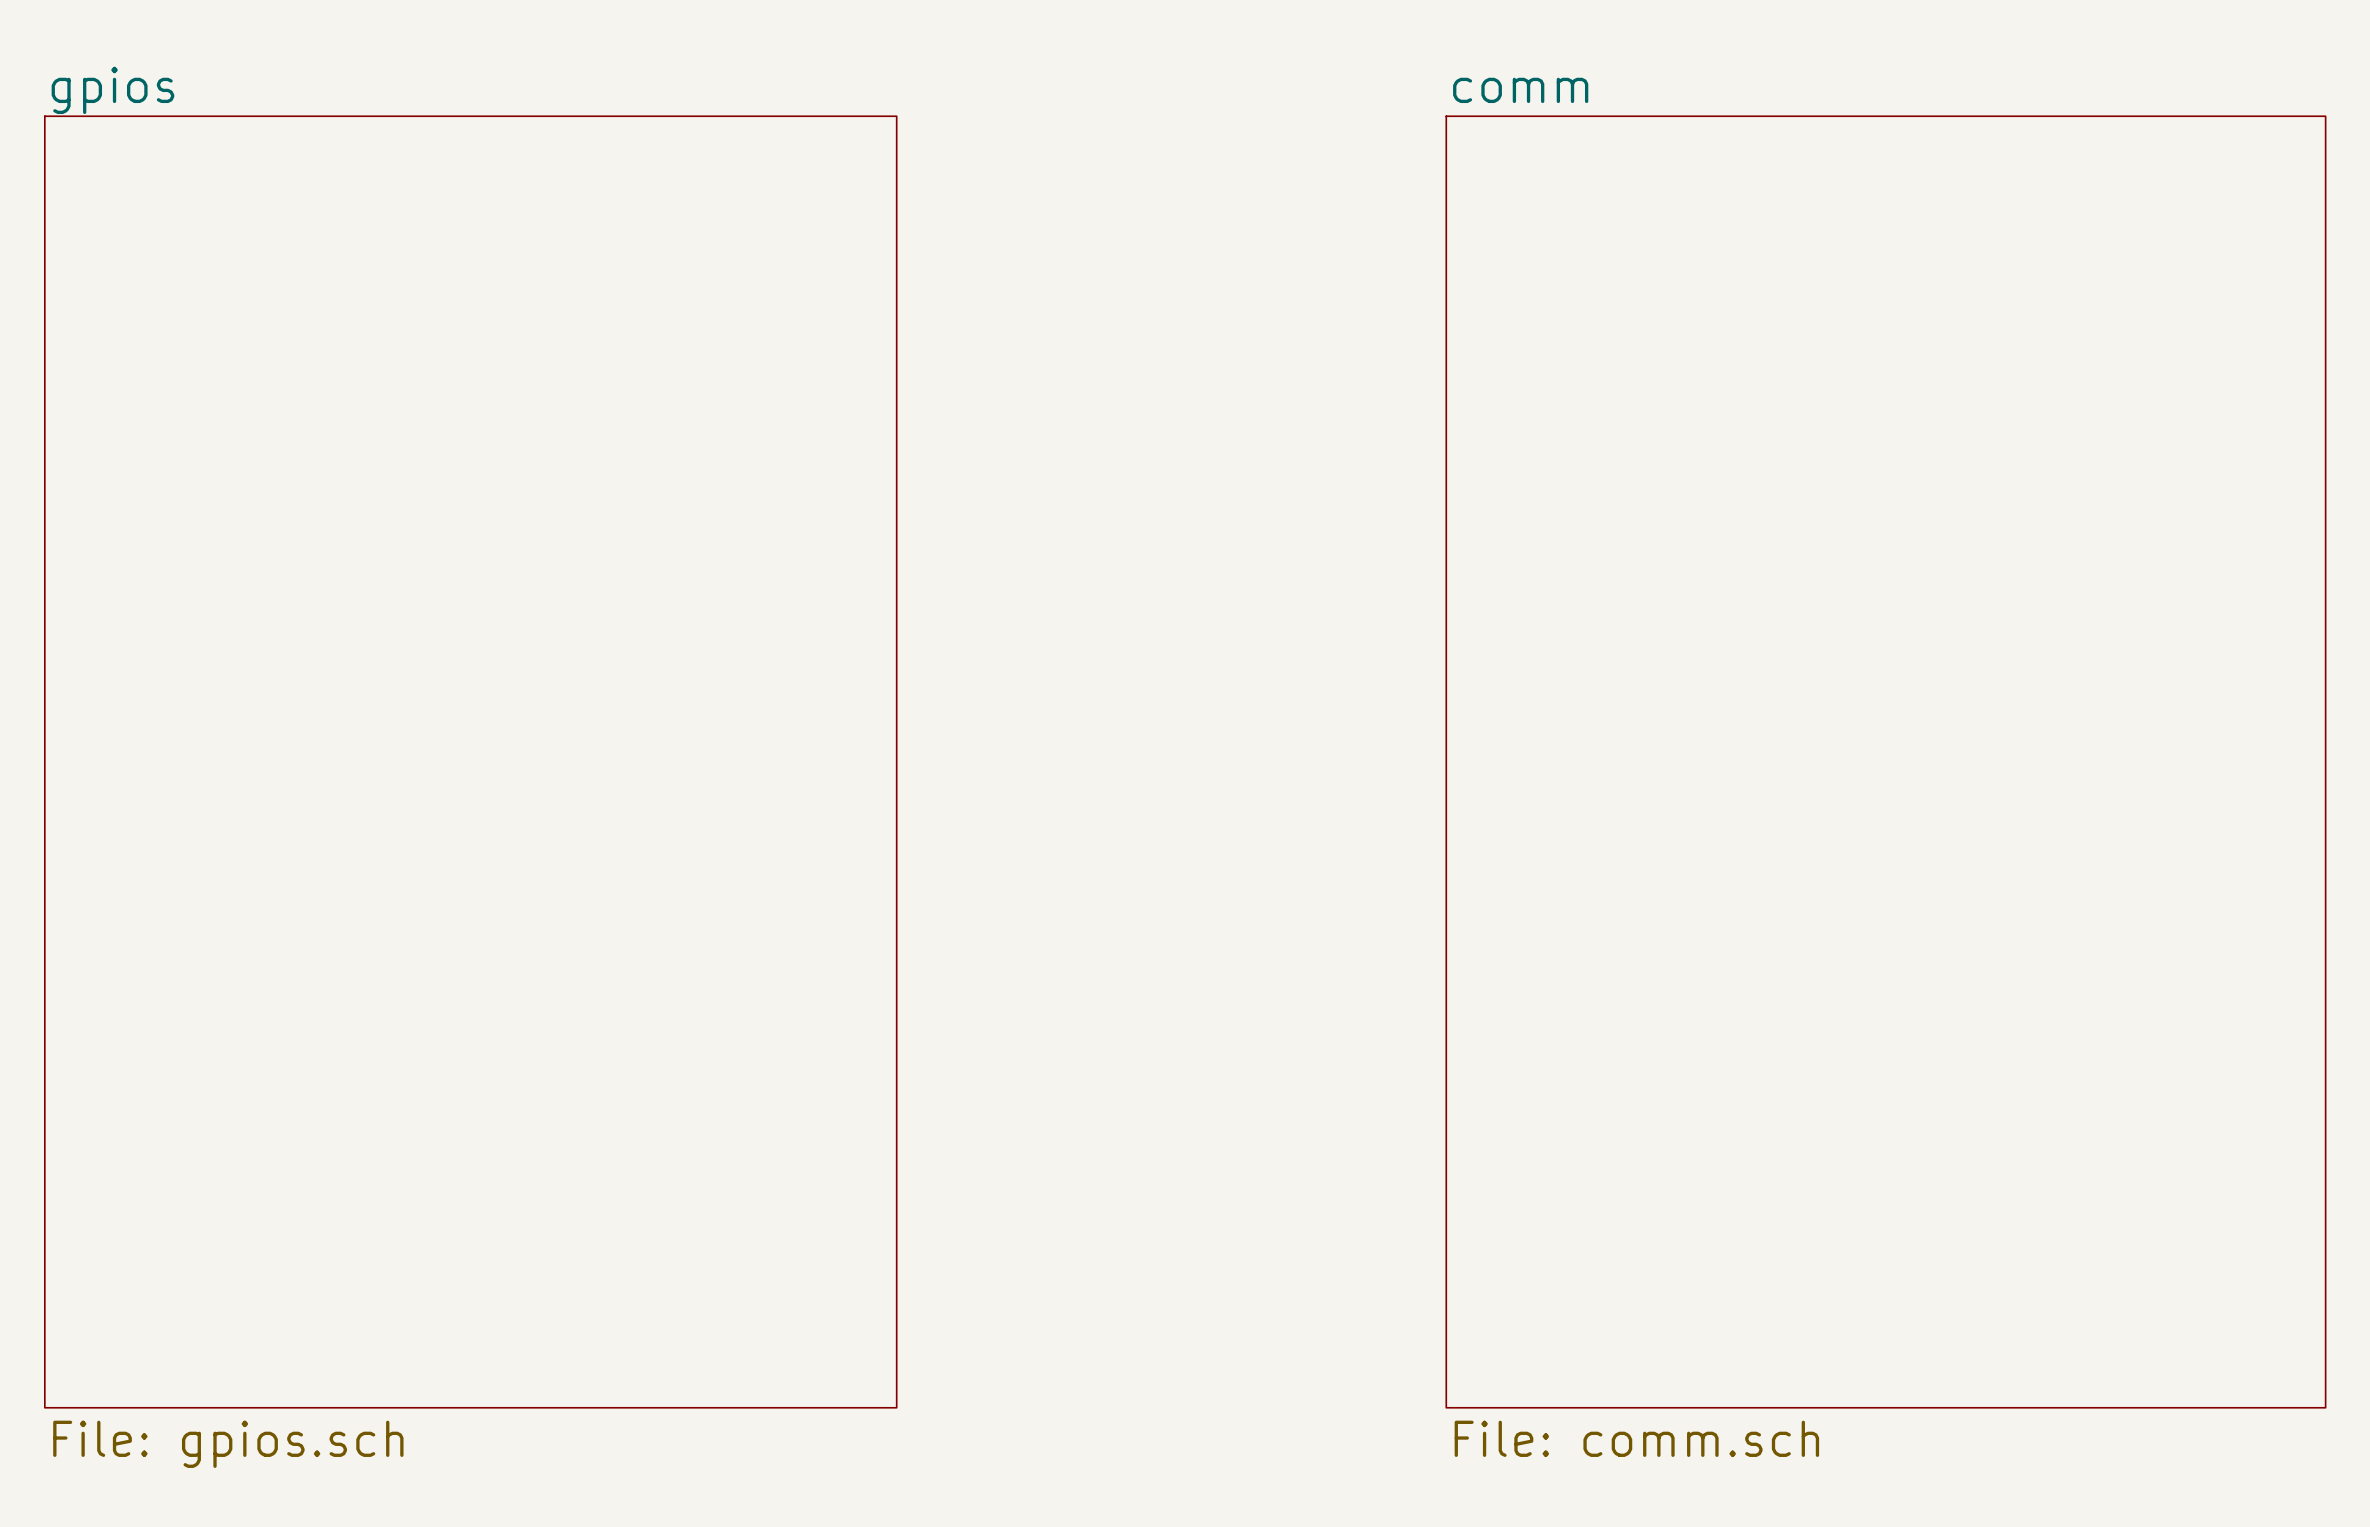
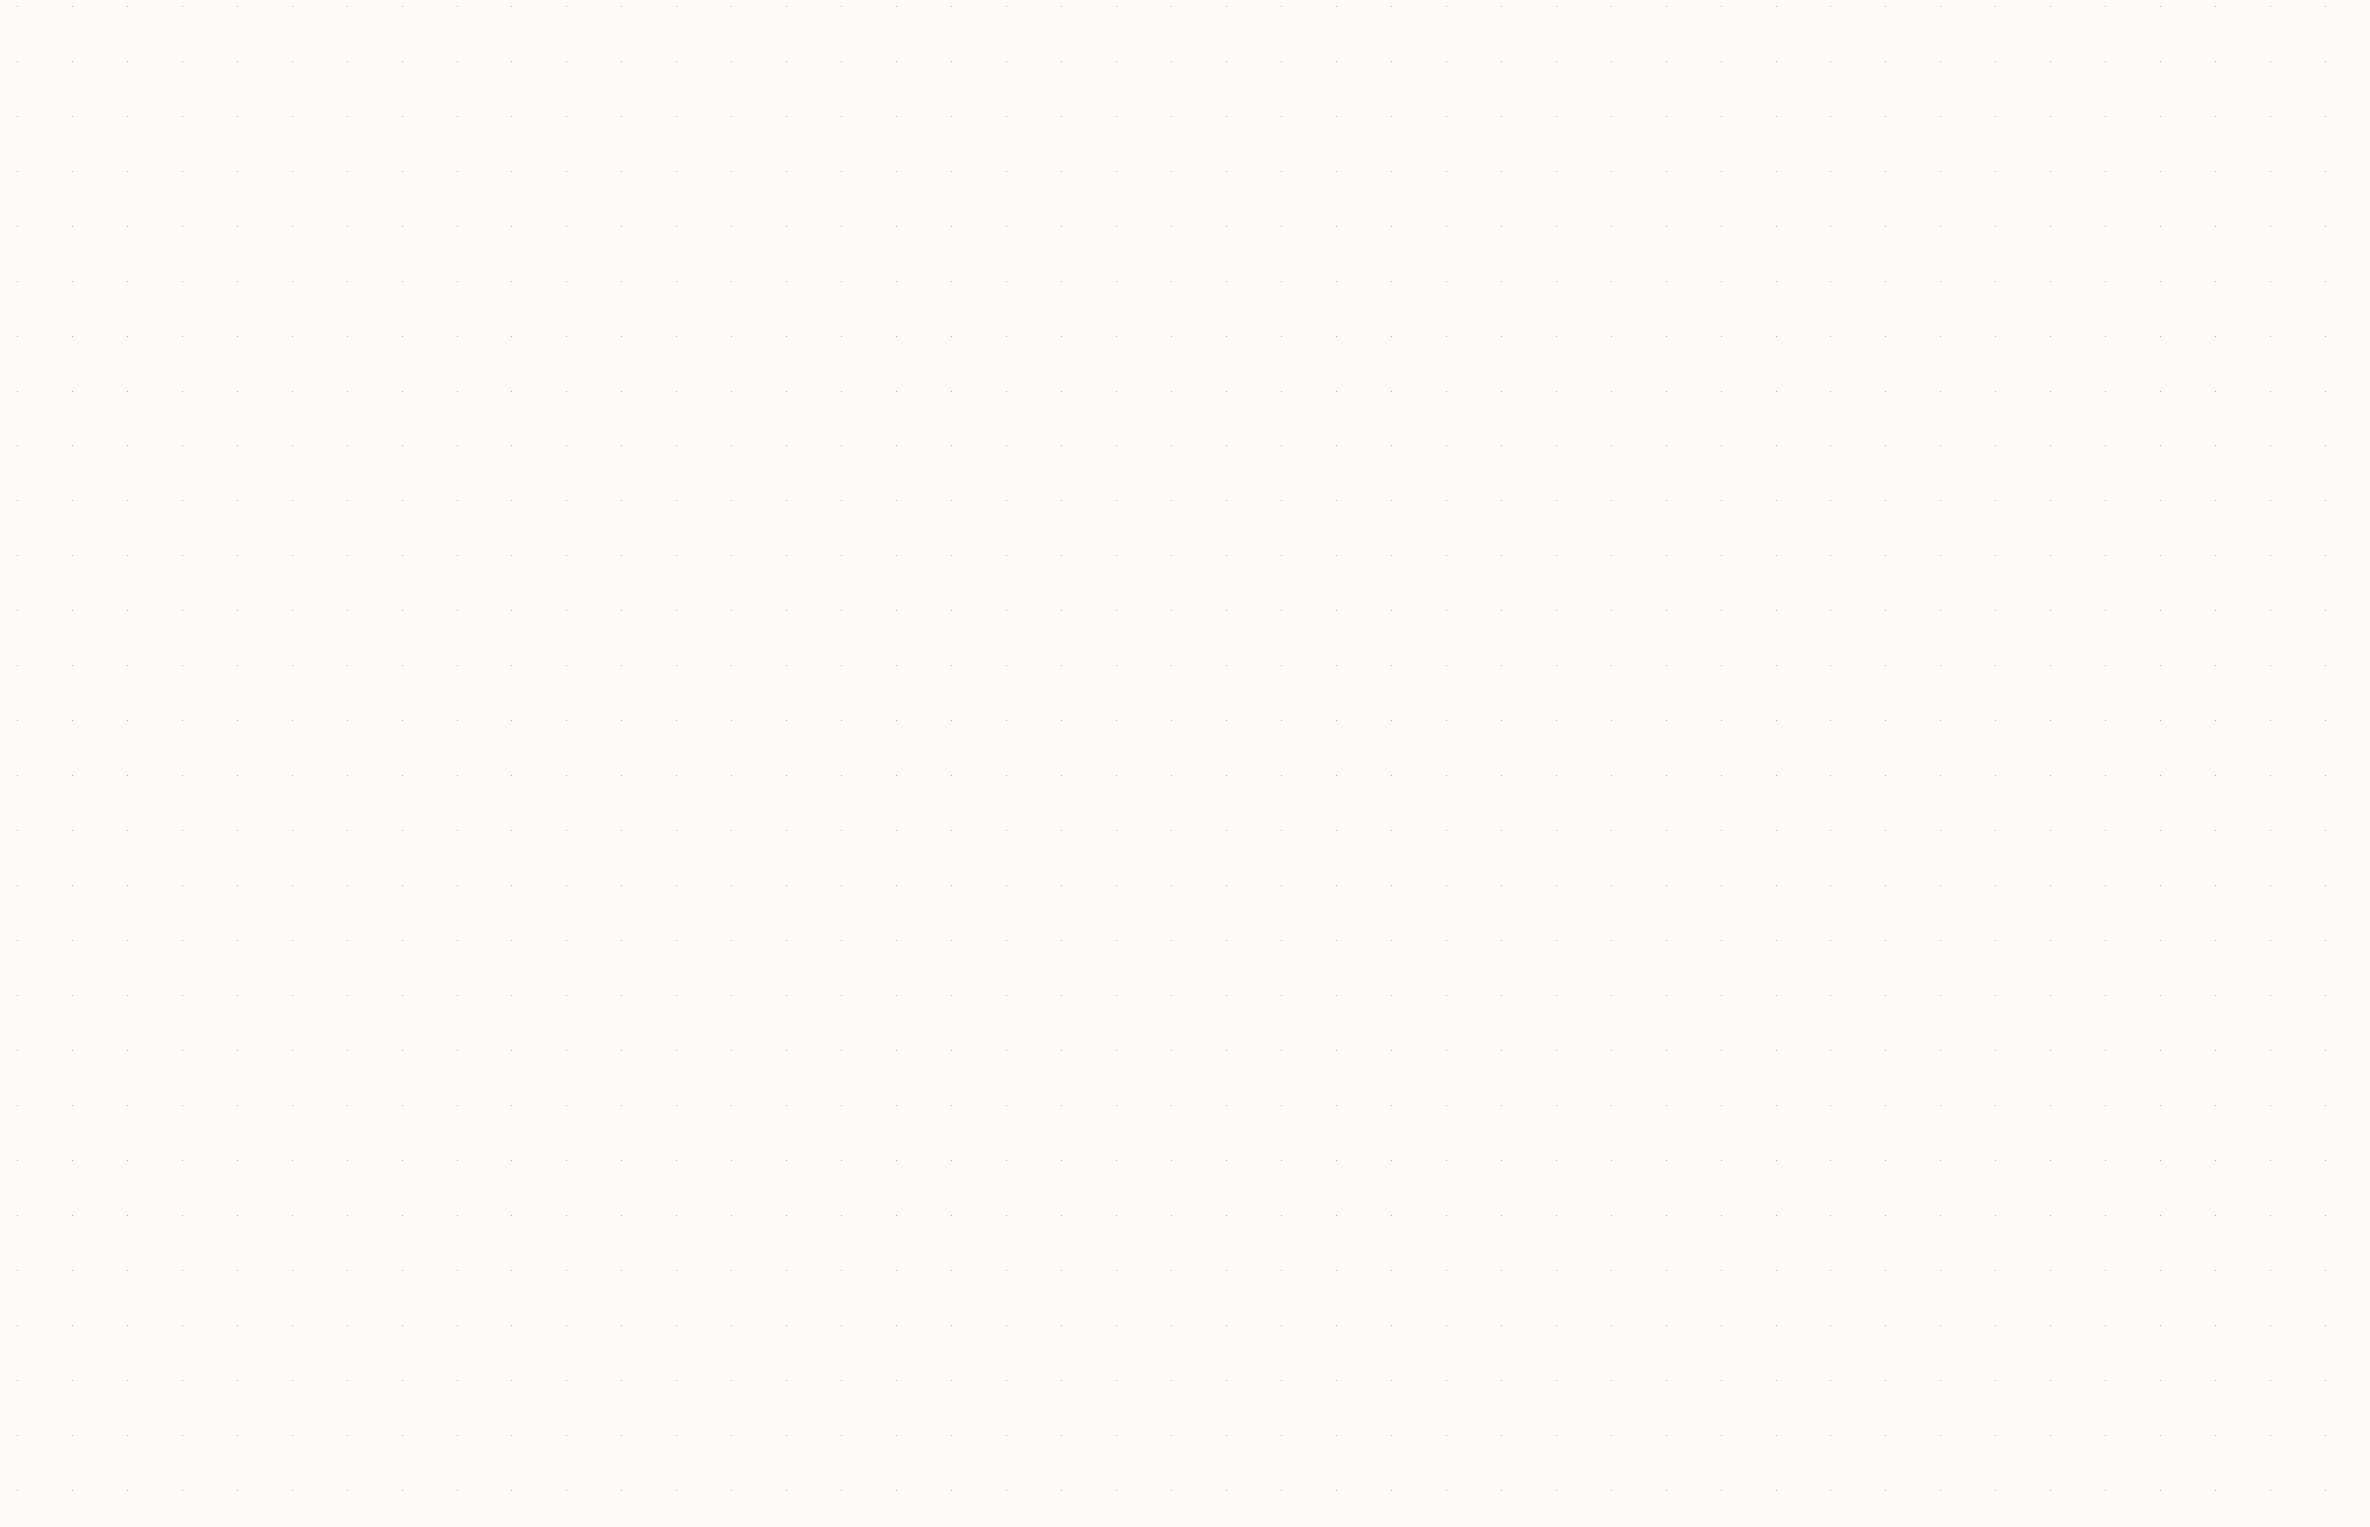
sheet gpios: File: gpios.sch (470, 762) -> none
sheet comm: File: comm.sch (1885, 762) -> none

